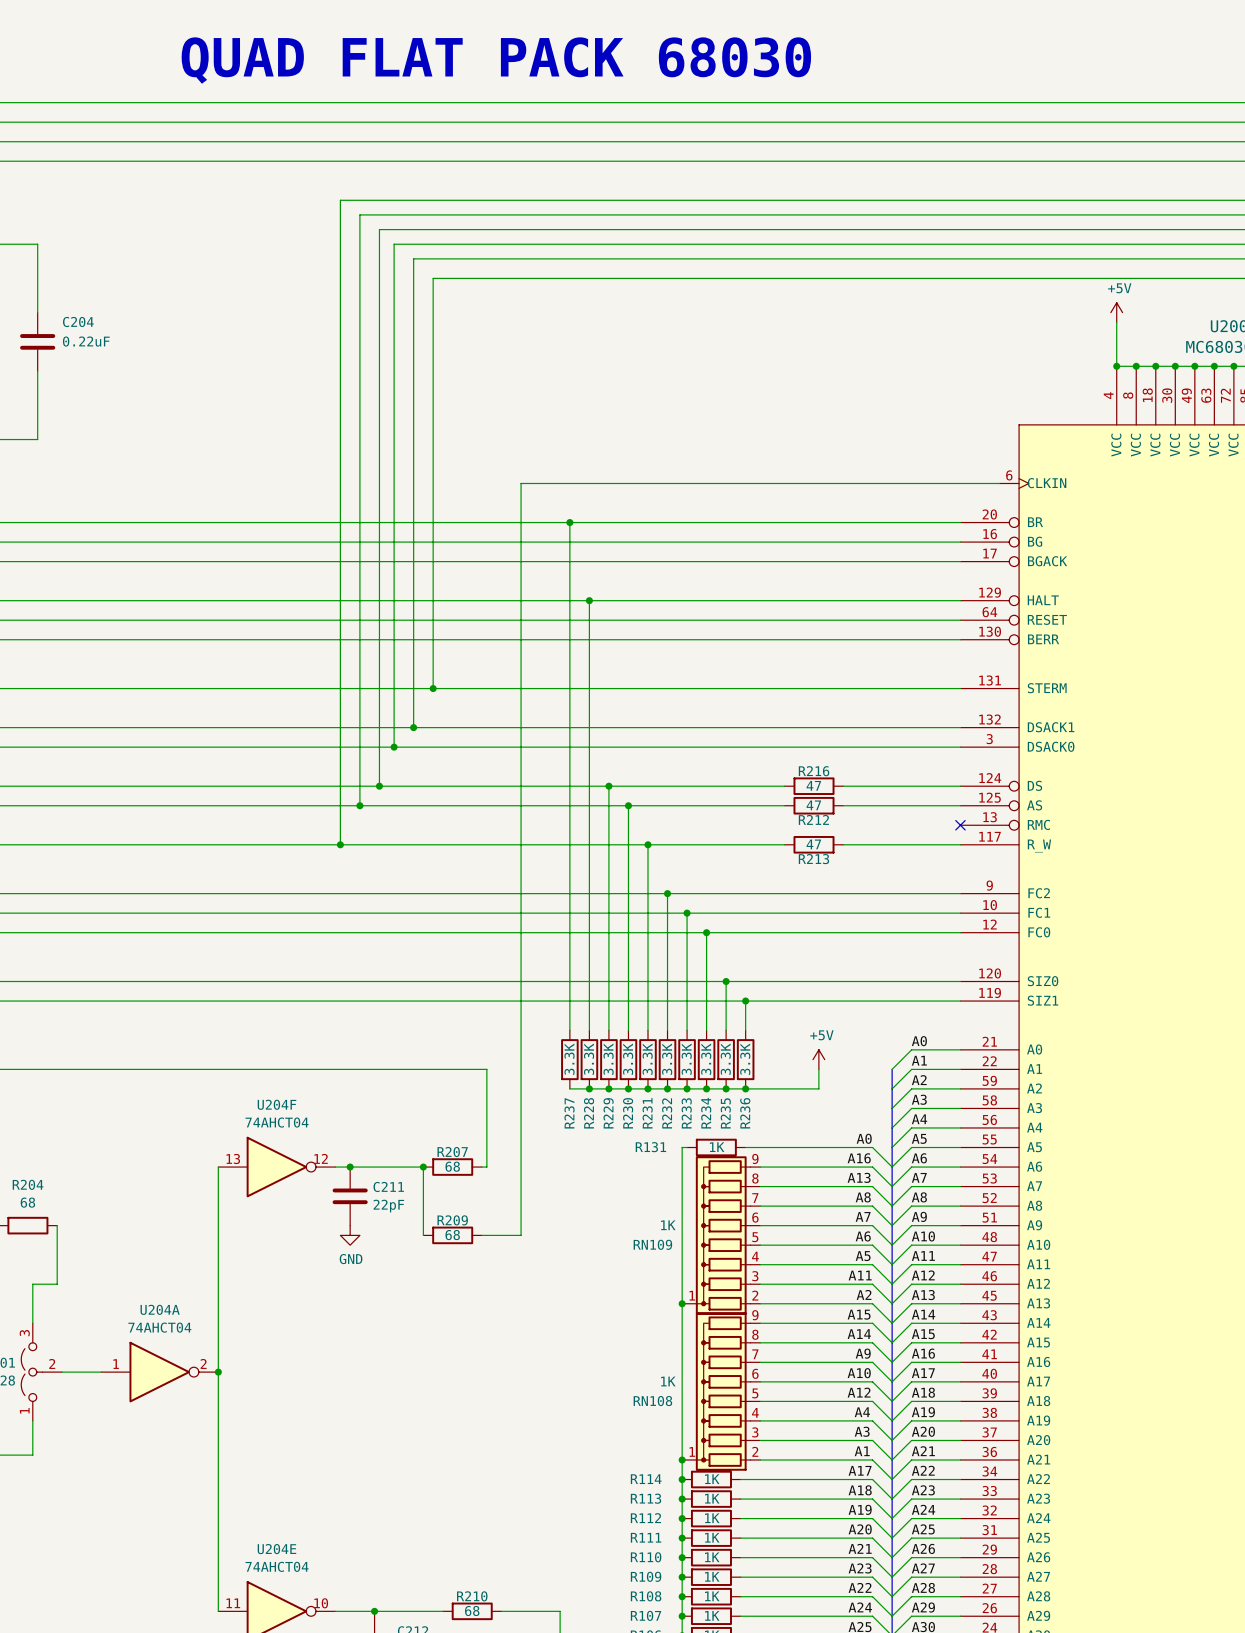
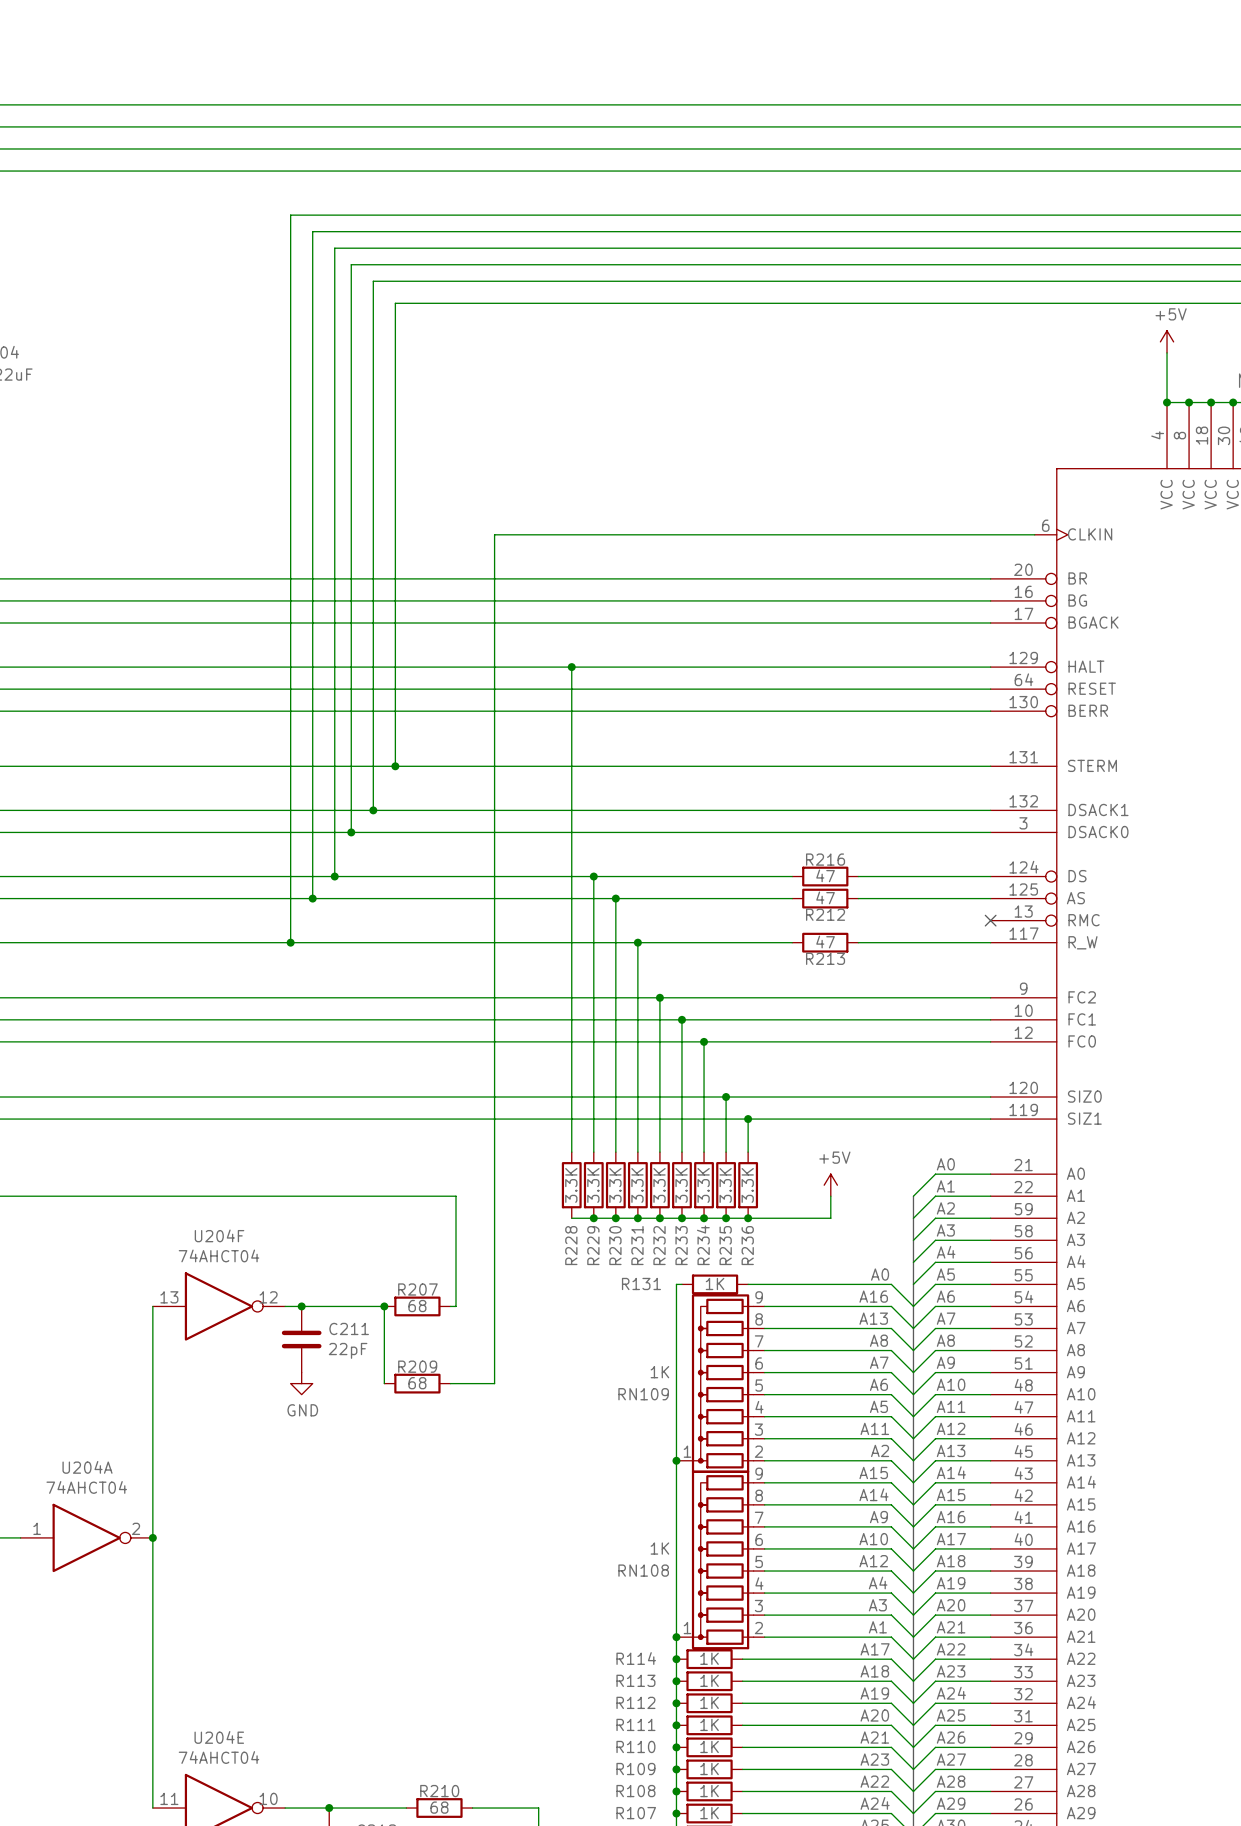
text: QUAD FLAT PACK 68030 (496, 60) -> none
wire: (569, 522) (569, 1030) -> none
junction: (569, 522) -> none
R237: 3.3K (569, 1059) -> none
wire: (569, 1088) (589, 1088) -> none
junction: (589, 1088) -> none

